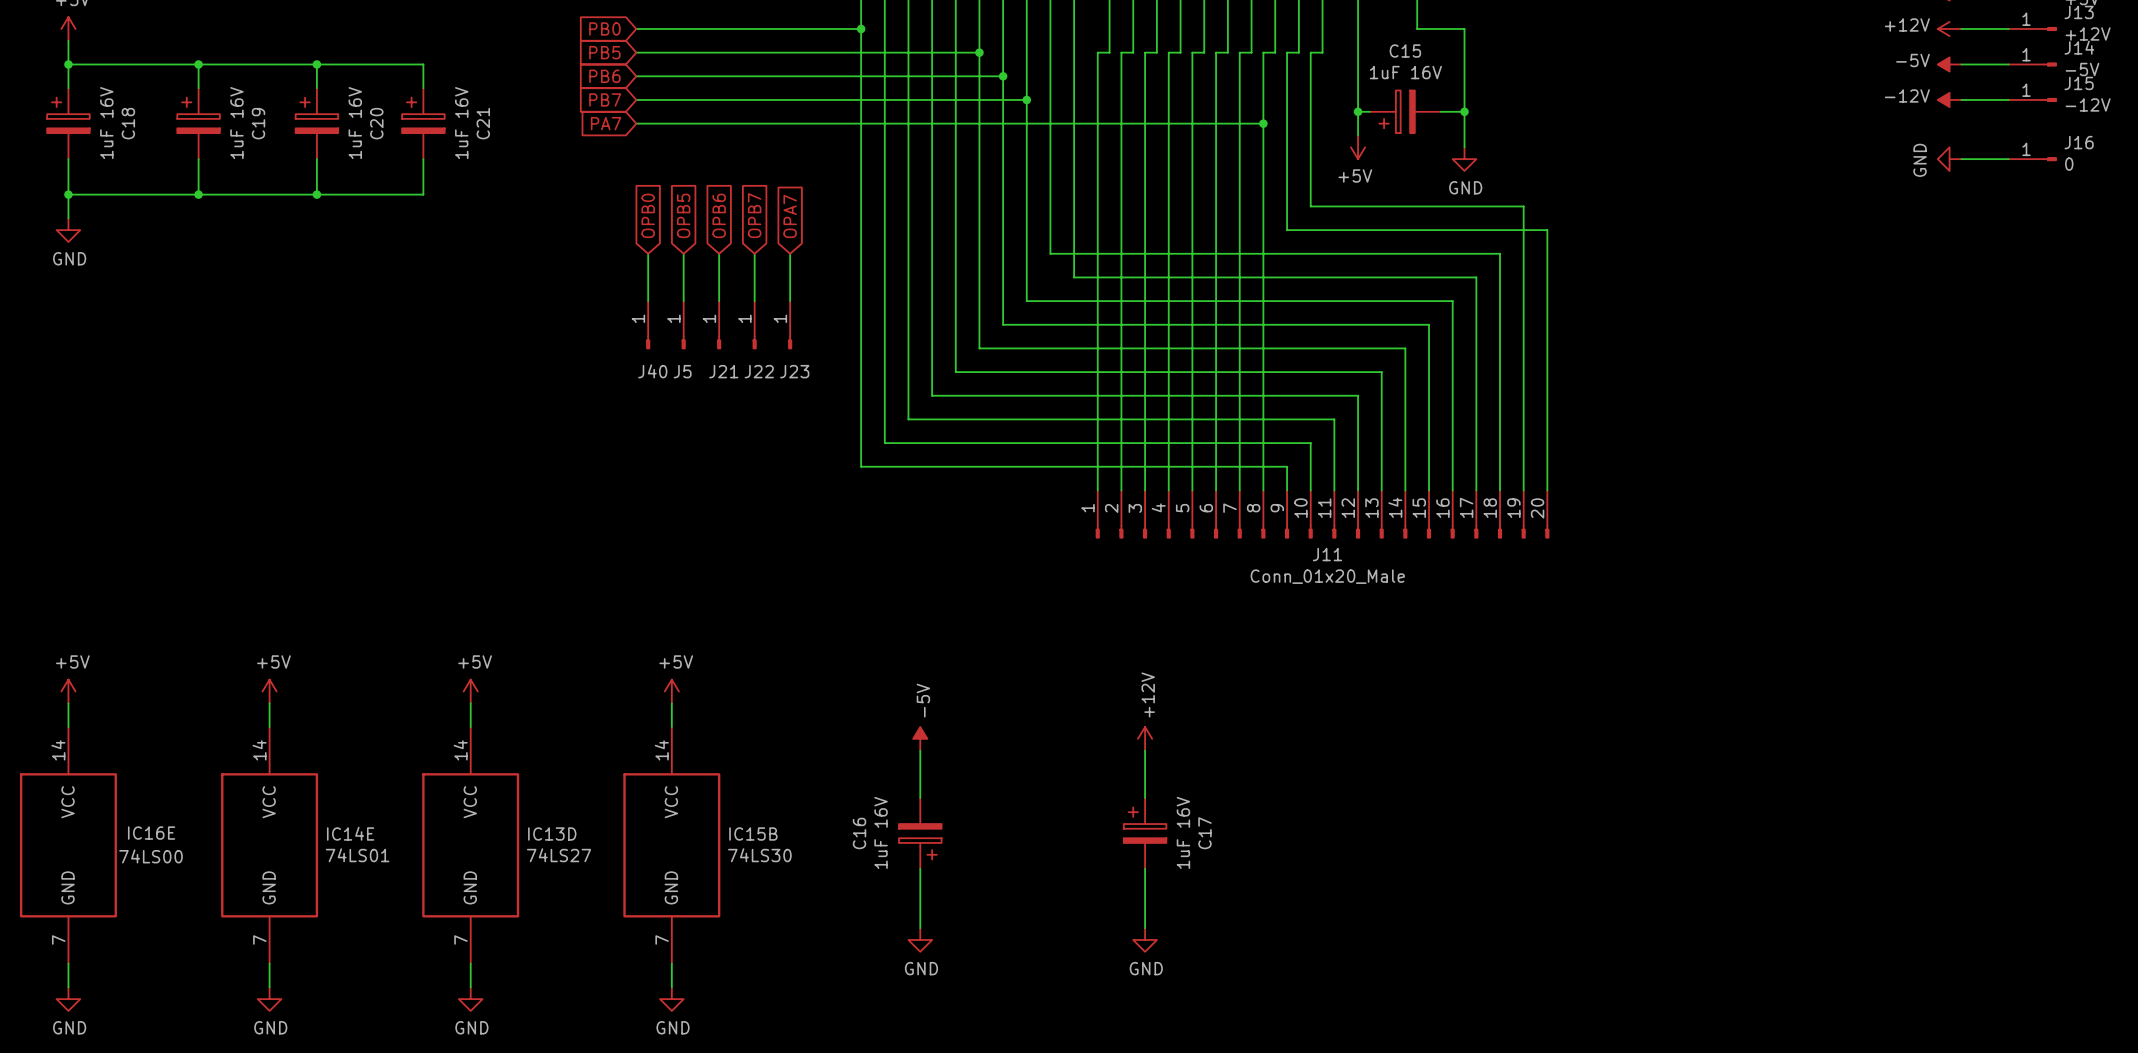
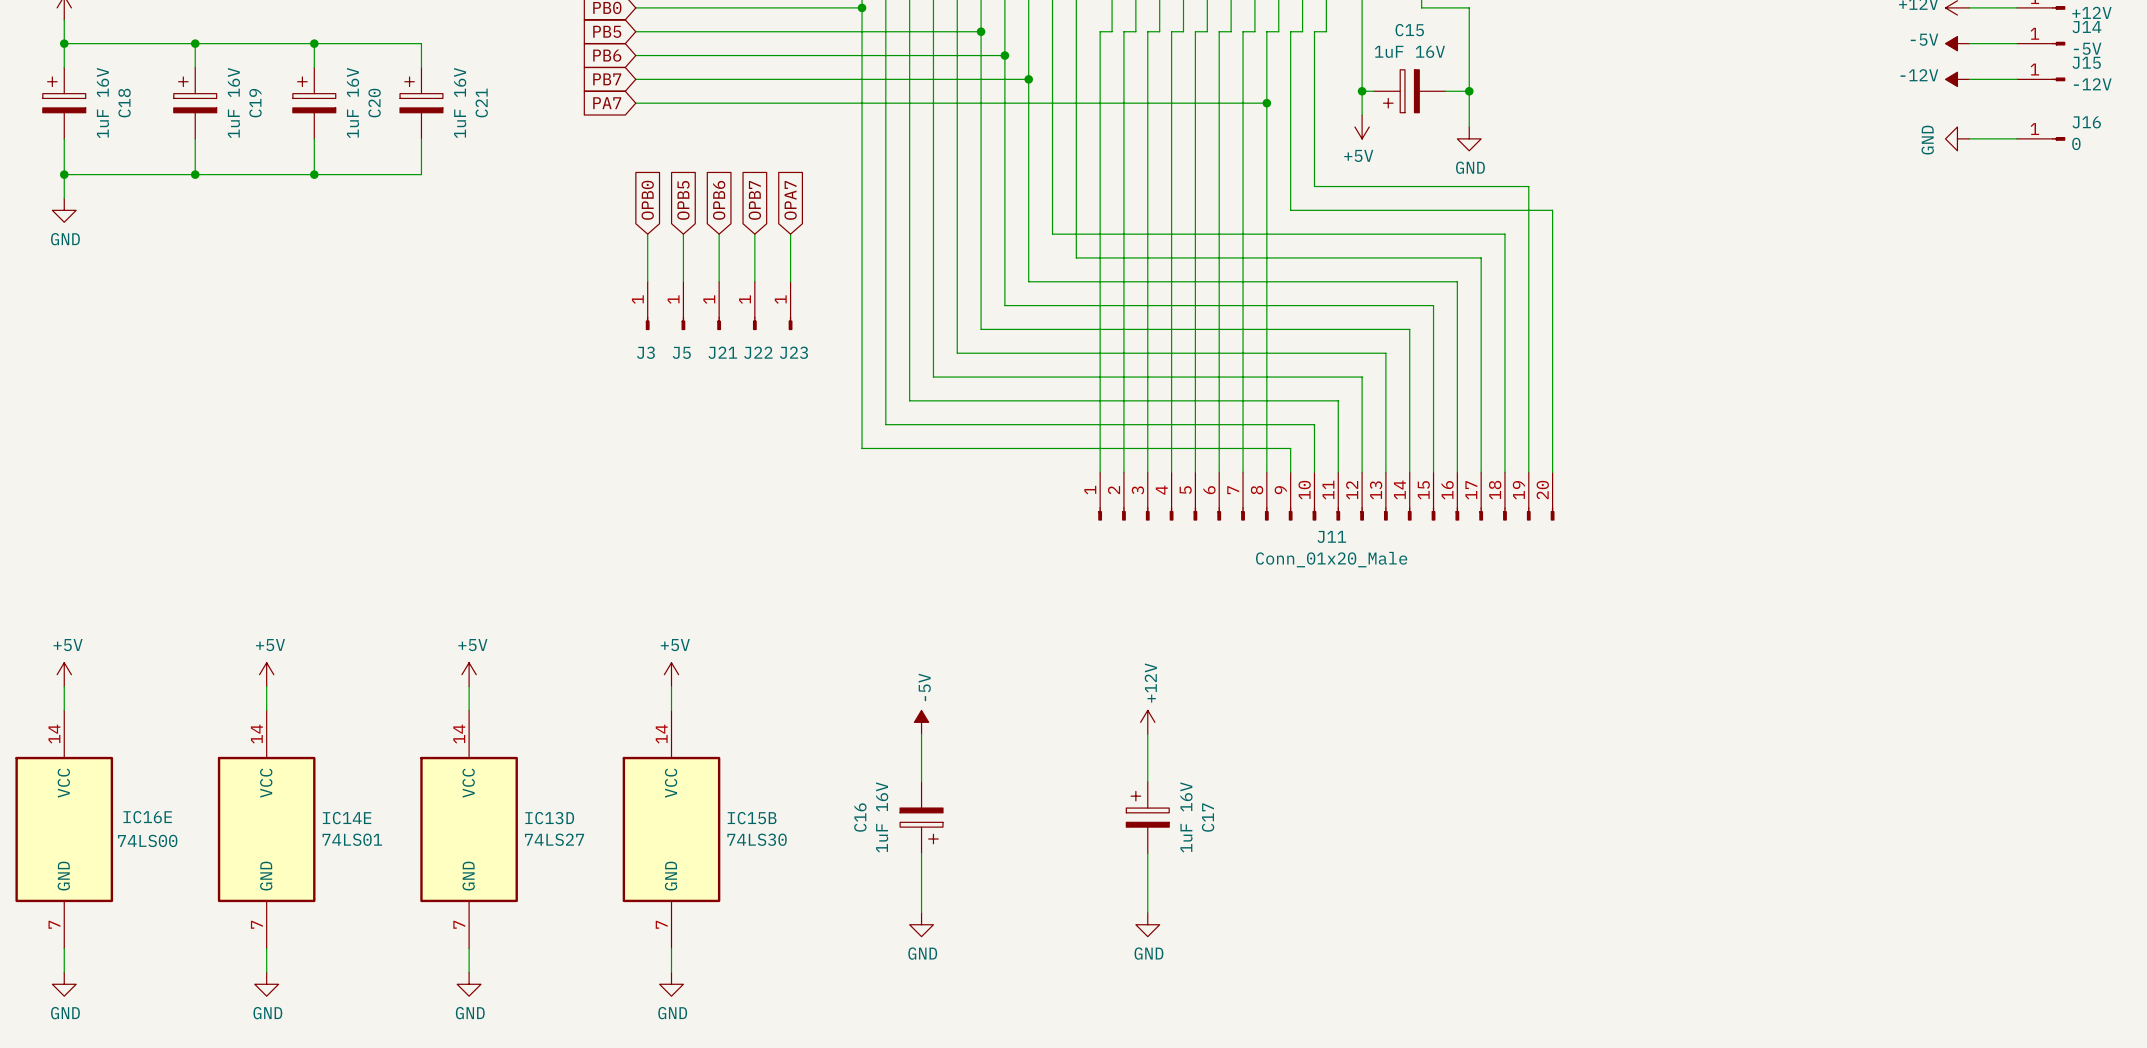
J40 name: J40 (652, 371) -> J3 (645, 352)

